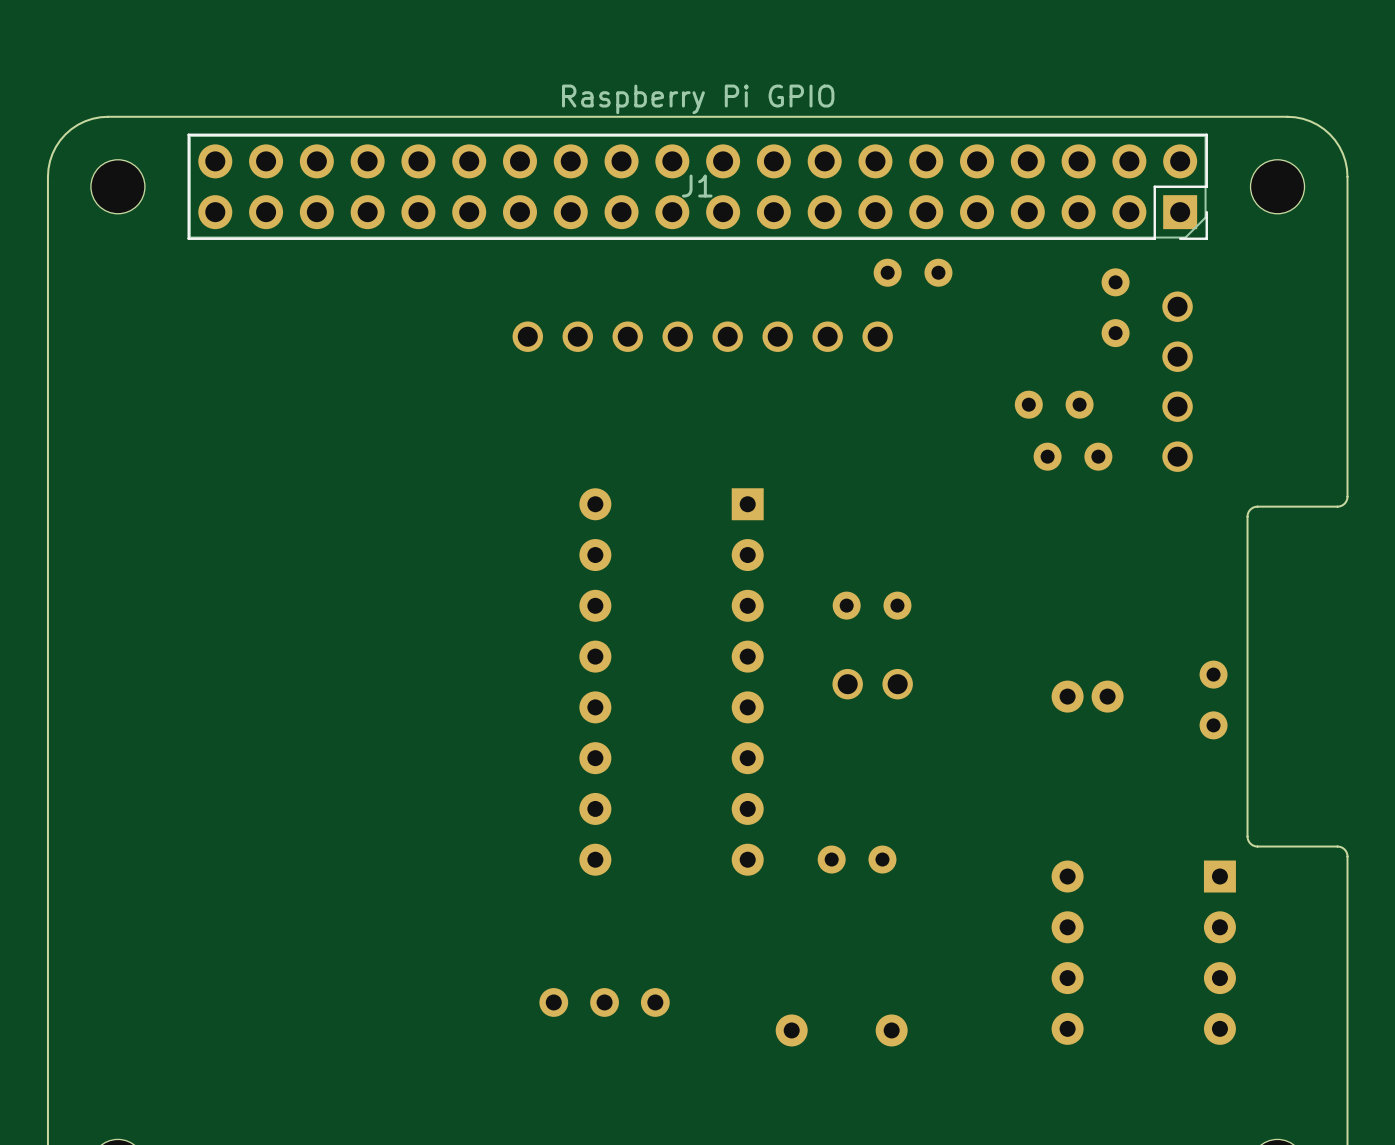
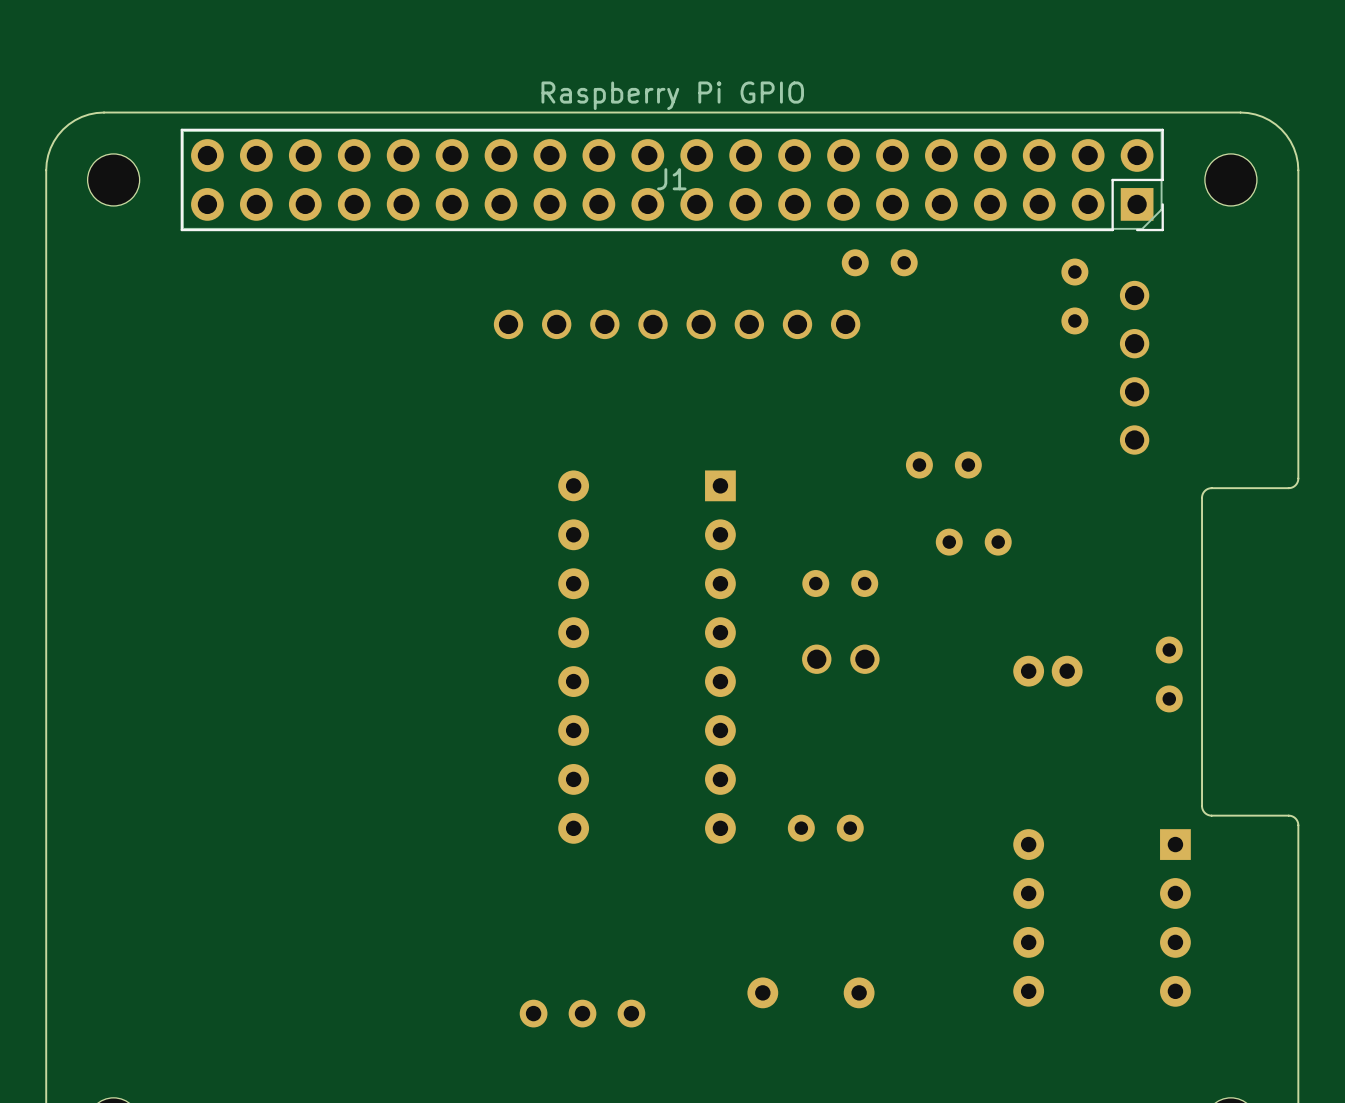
part: (1054, 404) -> none
part: (1073, 456) -> none
part: none -> (943, 465)
part: none -> (973, 542)
part position: (604, 1002) -> (582, 1013)

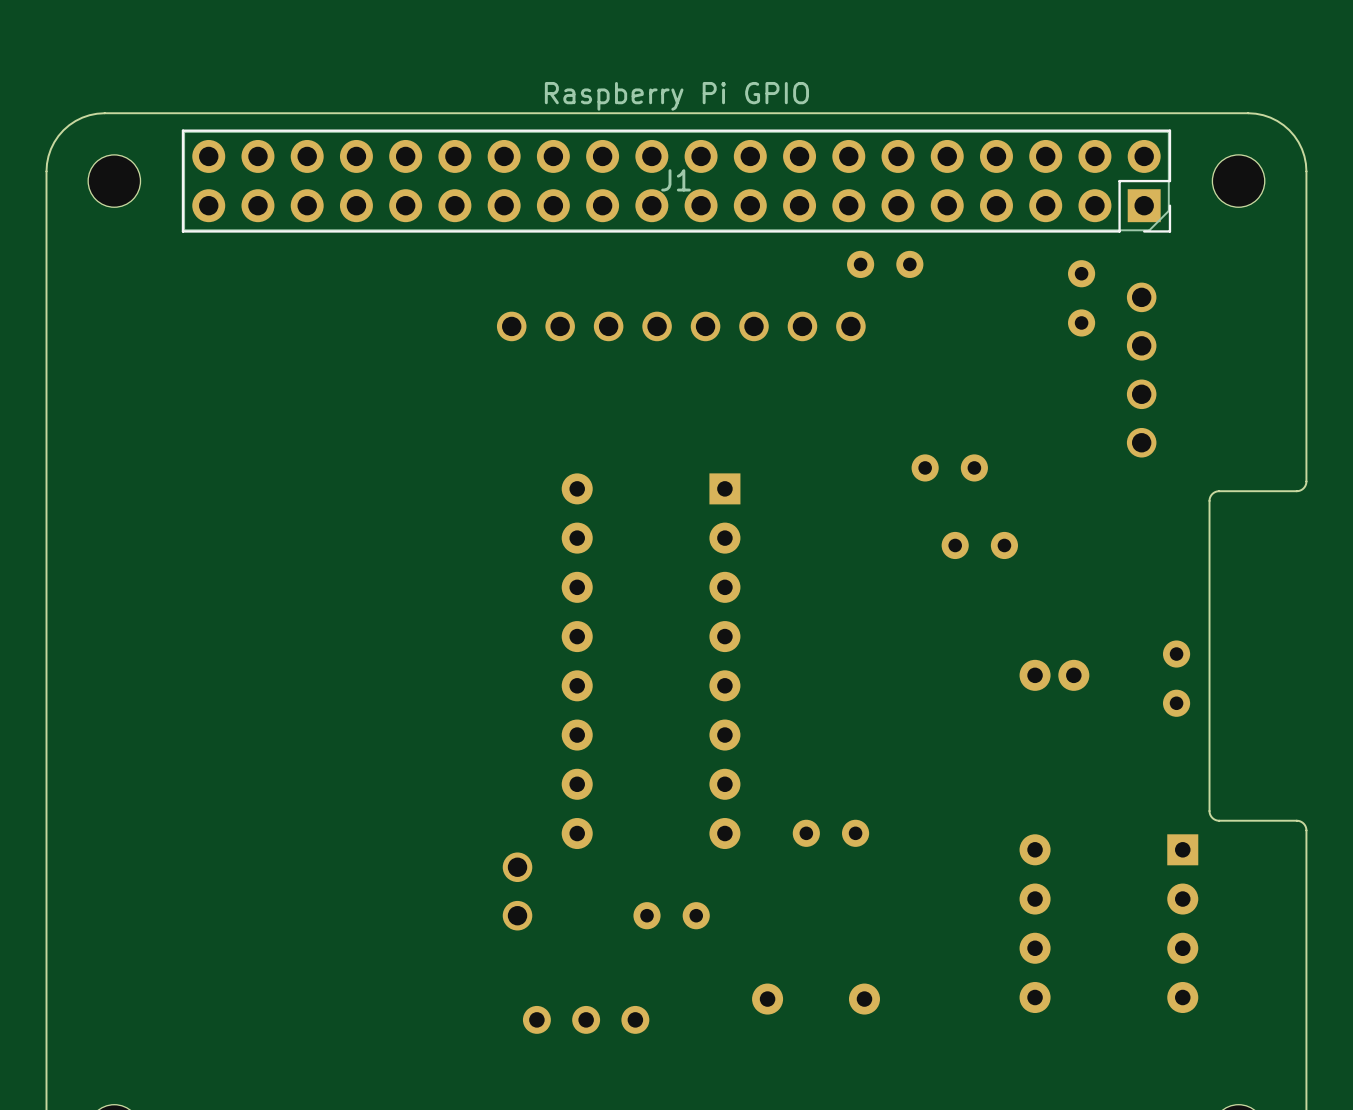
part position: (840, 583) -> (671, 915)
part: (840, 659) -> none
part: none -> (517, 891)

